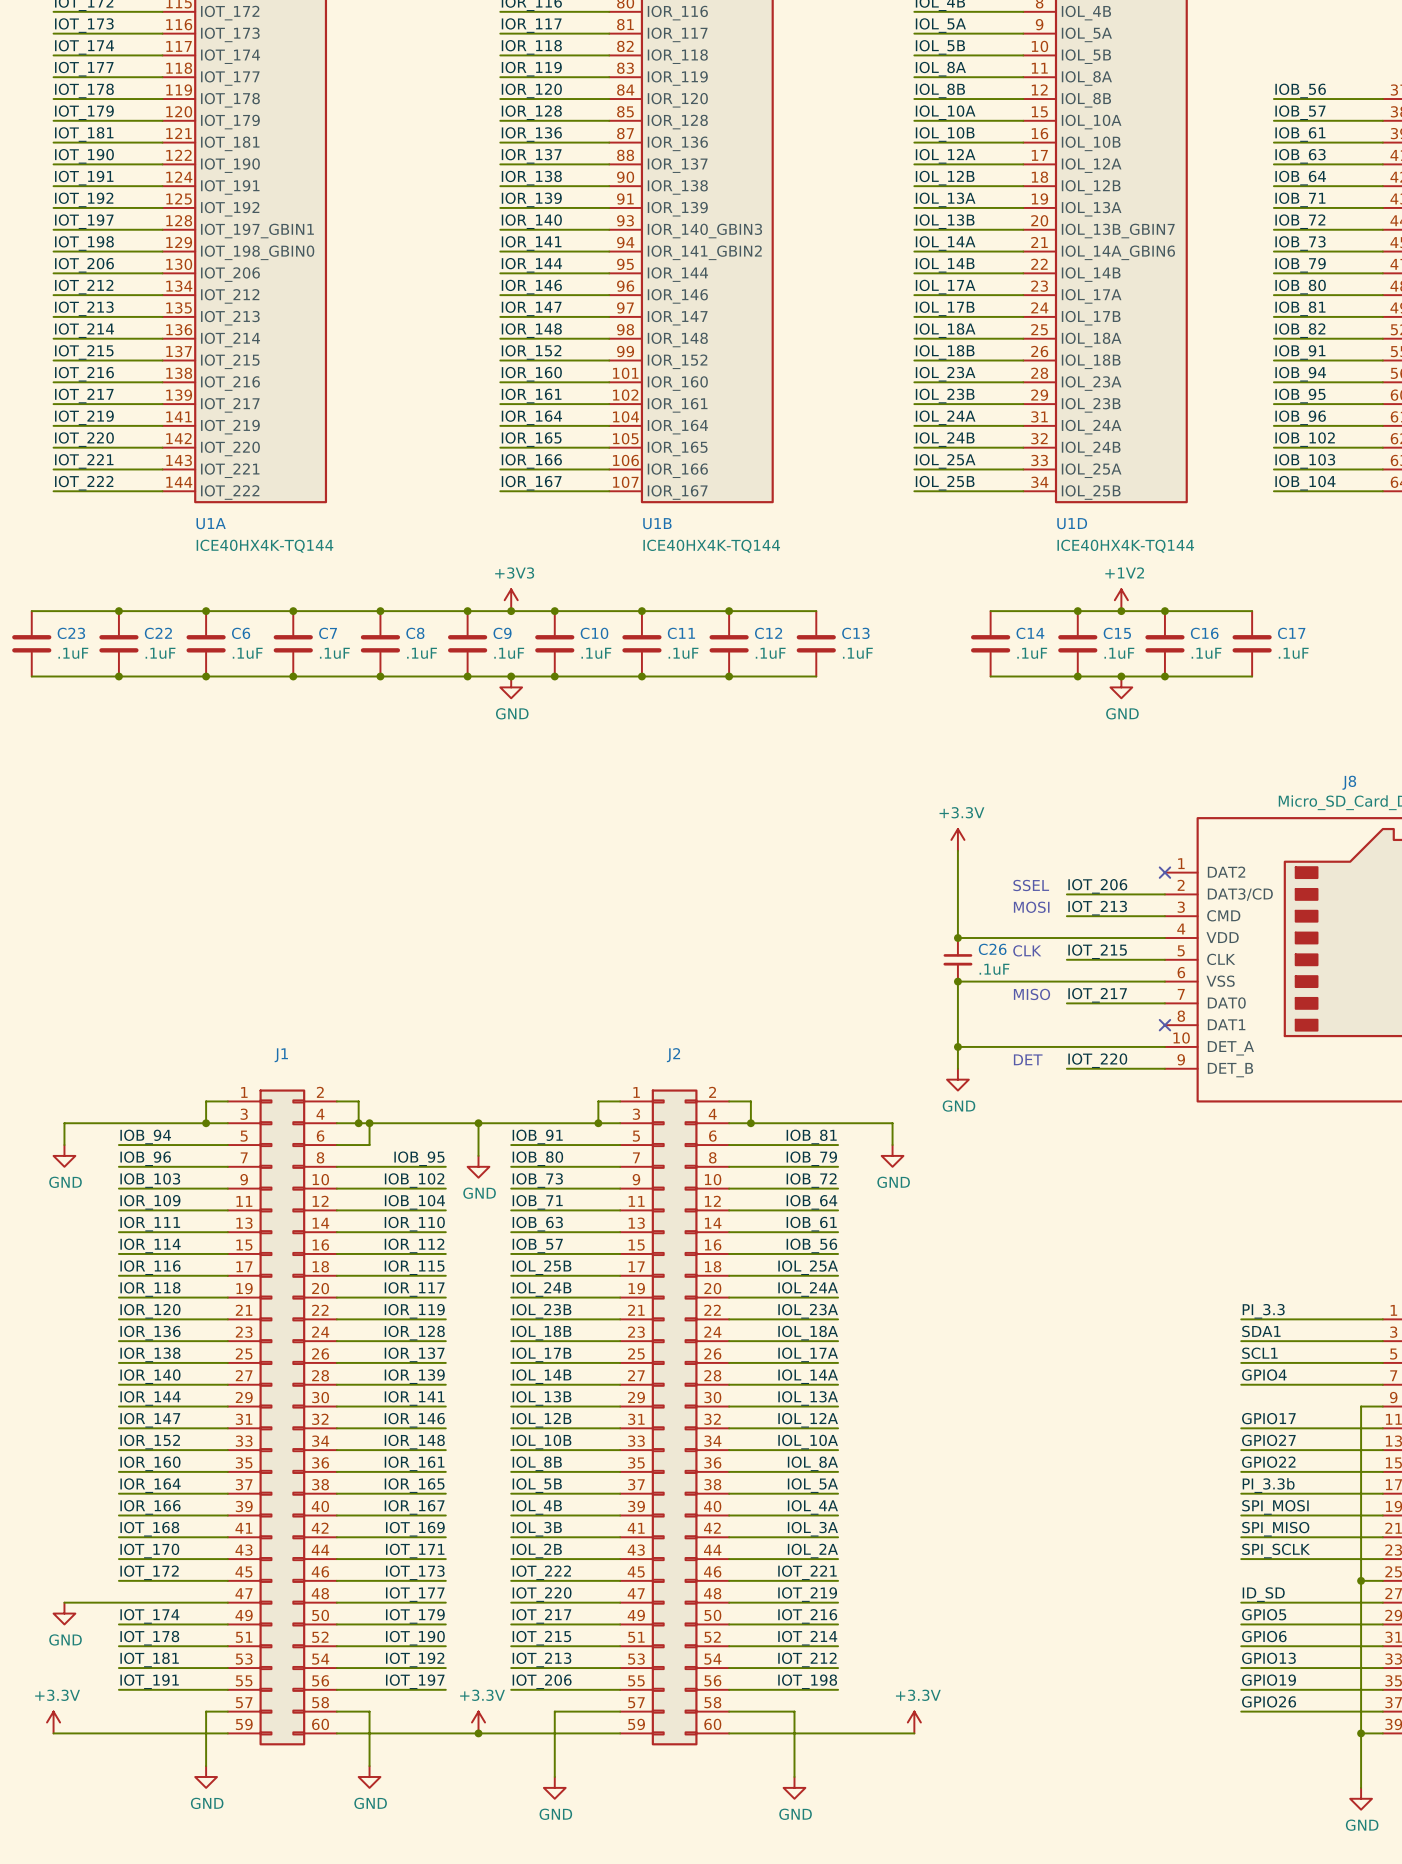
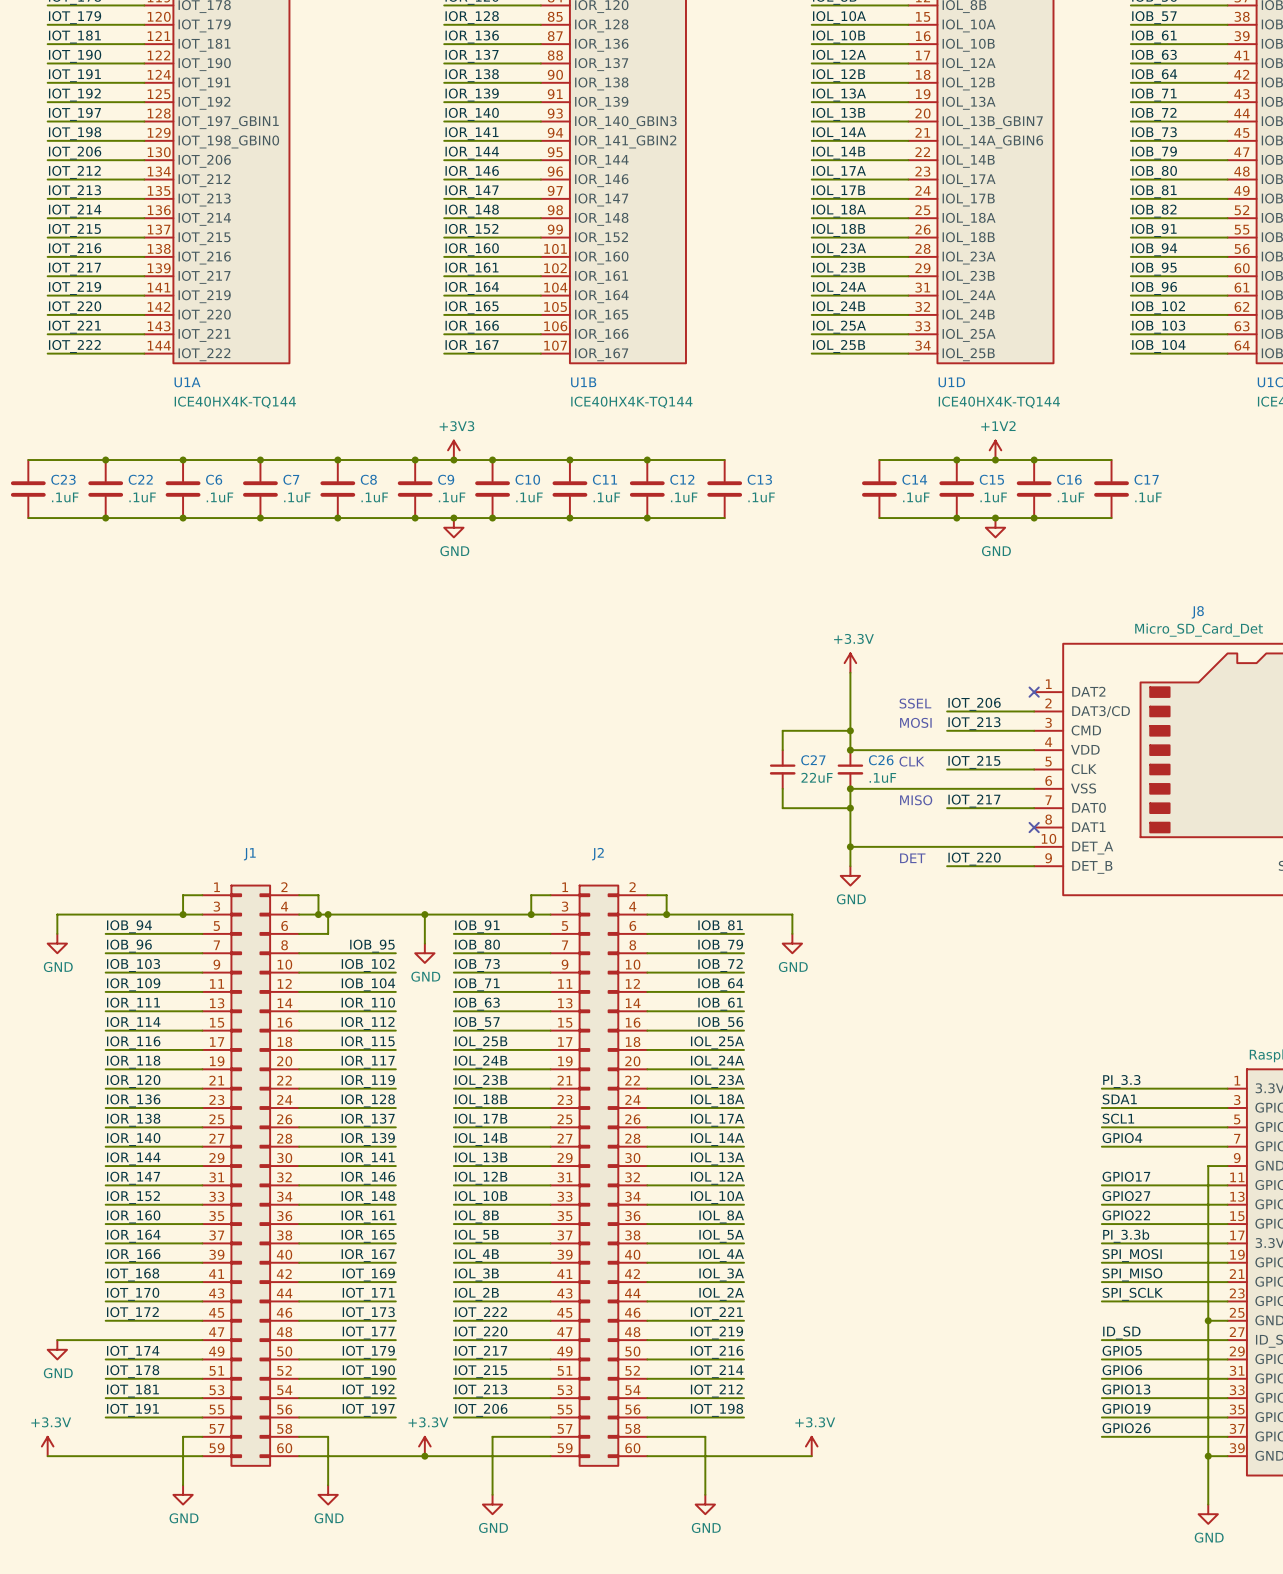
wire: none -> (850, 730) (782, 730) (782, 750)
junction: none -> (850, 730)
C27: none -> 22uF (782, 769)
wire: none -> (782, 788) (782, 808) (850, 808)
junction: none -> (850, 808)

